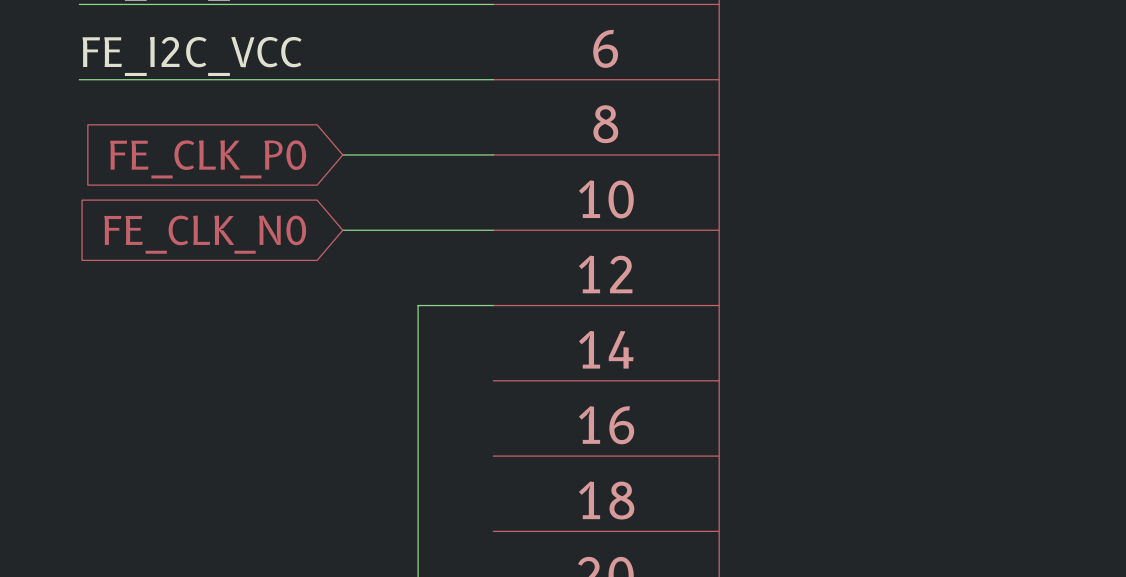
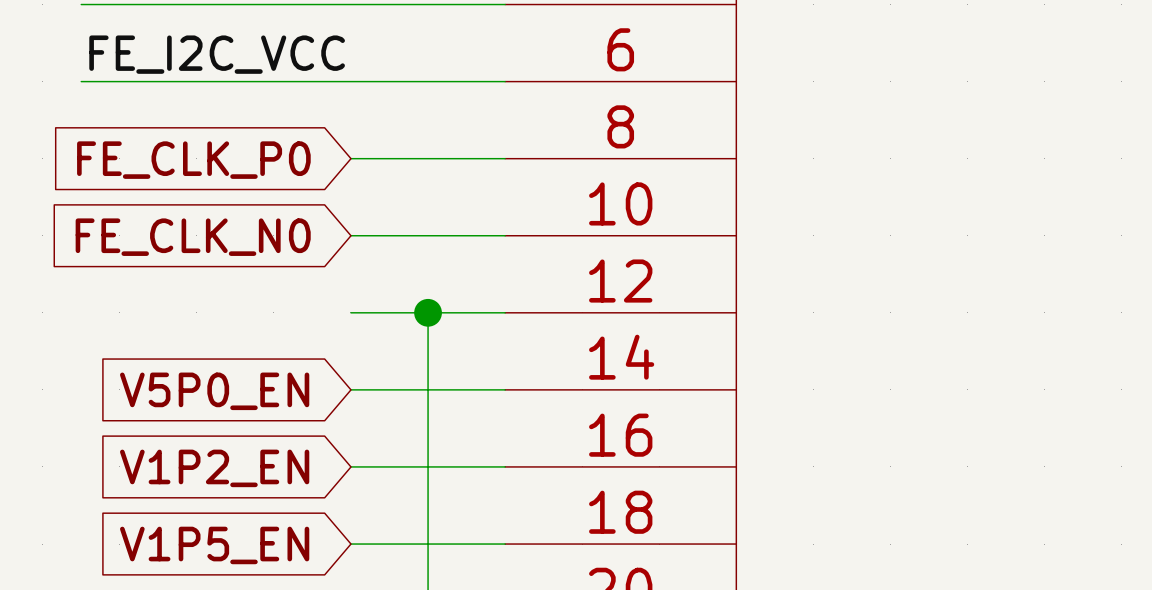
wire: none -> (350, 312) (428, 312)
junction: none -> (428, 312)
wire: none -> (350, 389) (505, 389)
global label: none -> V5P0_EN (214, 391)
wire: none -> (350, 466) (505, 466)
global label: none -> V1P2_EN (214, 468)
wire: none -> (350, 544) (505, 544)
global label: none -> V1P5_EN (214, 545)

